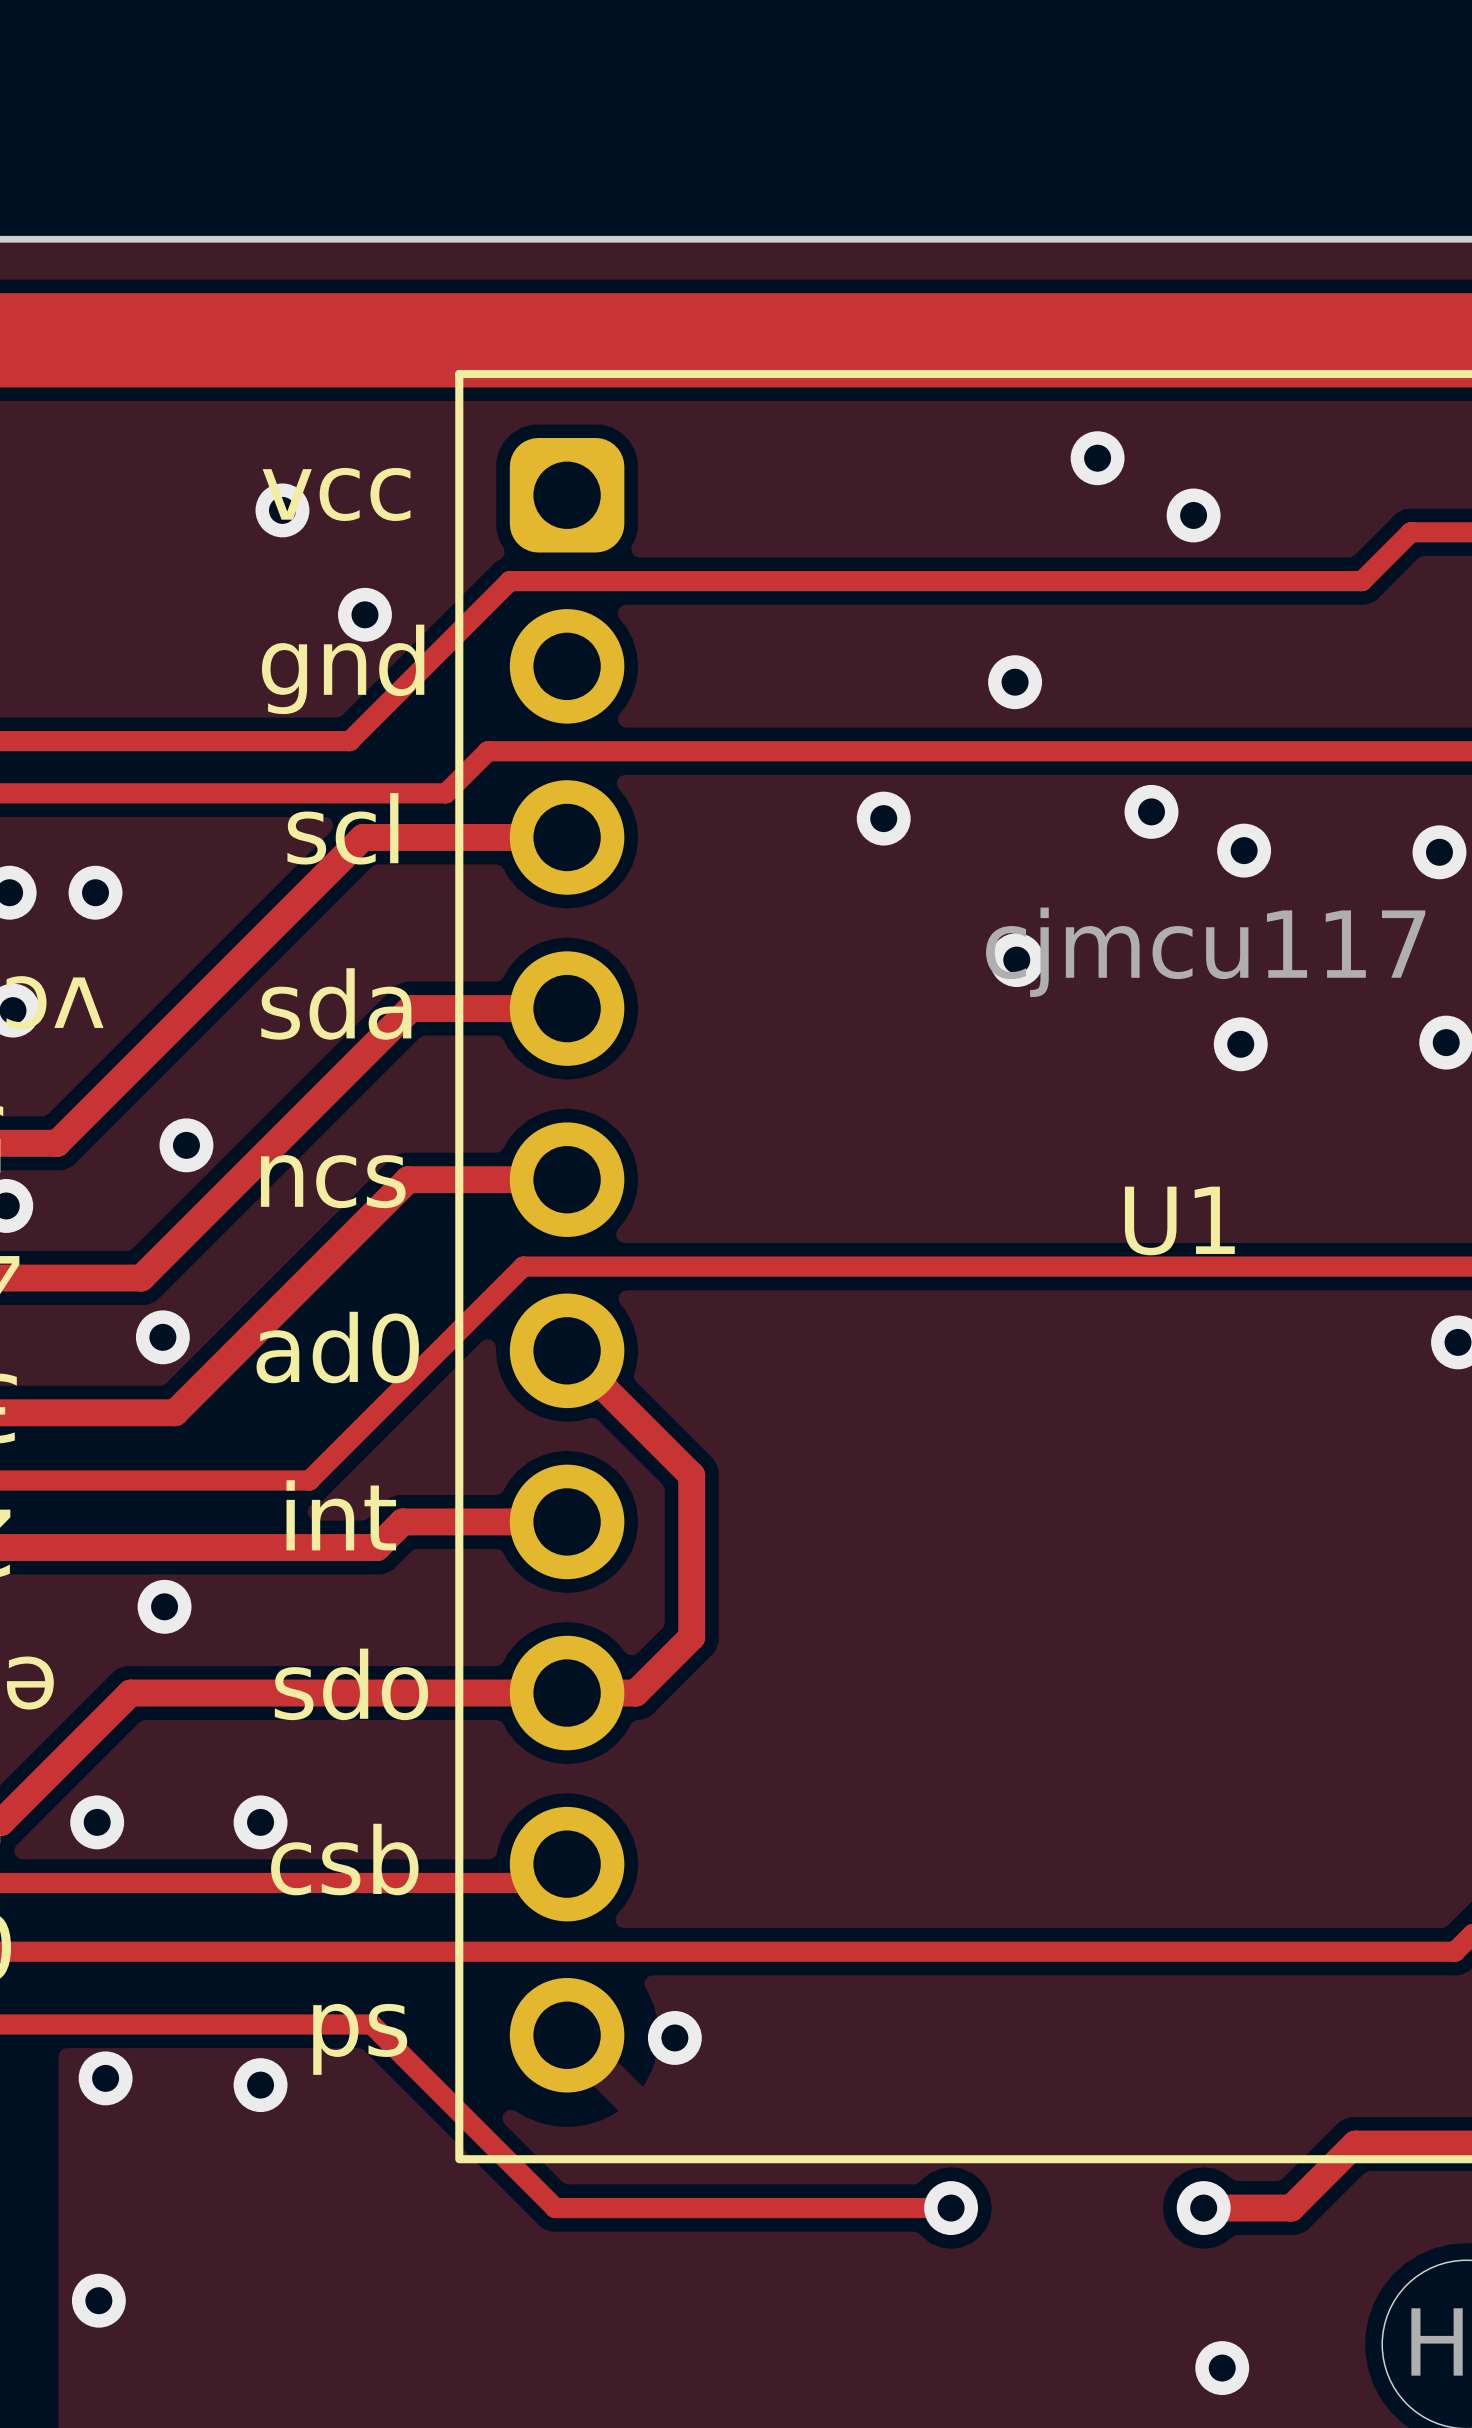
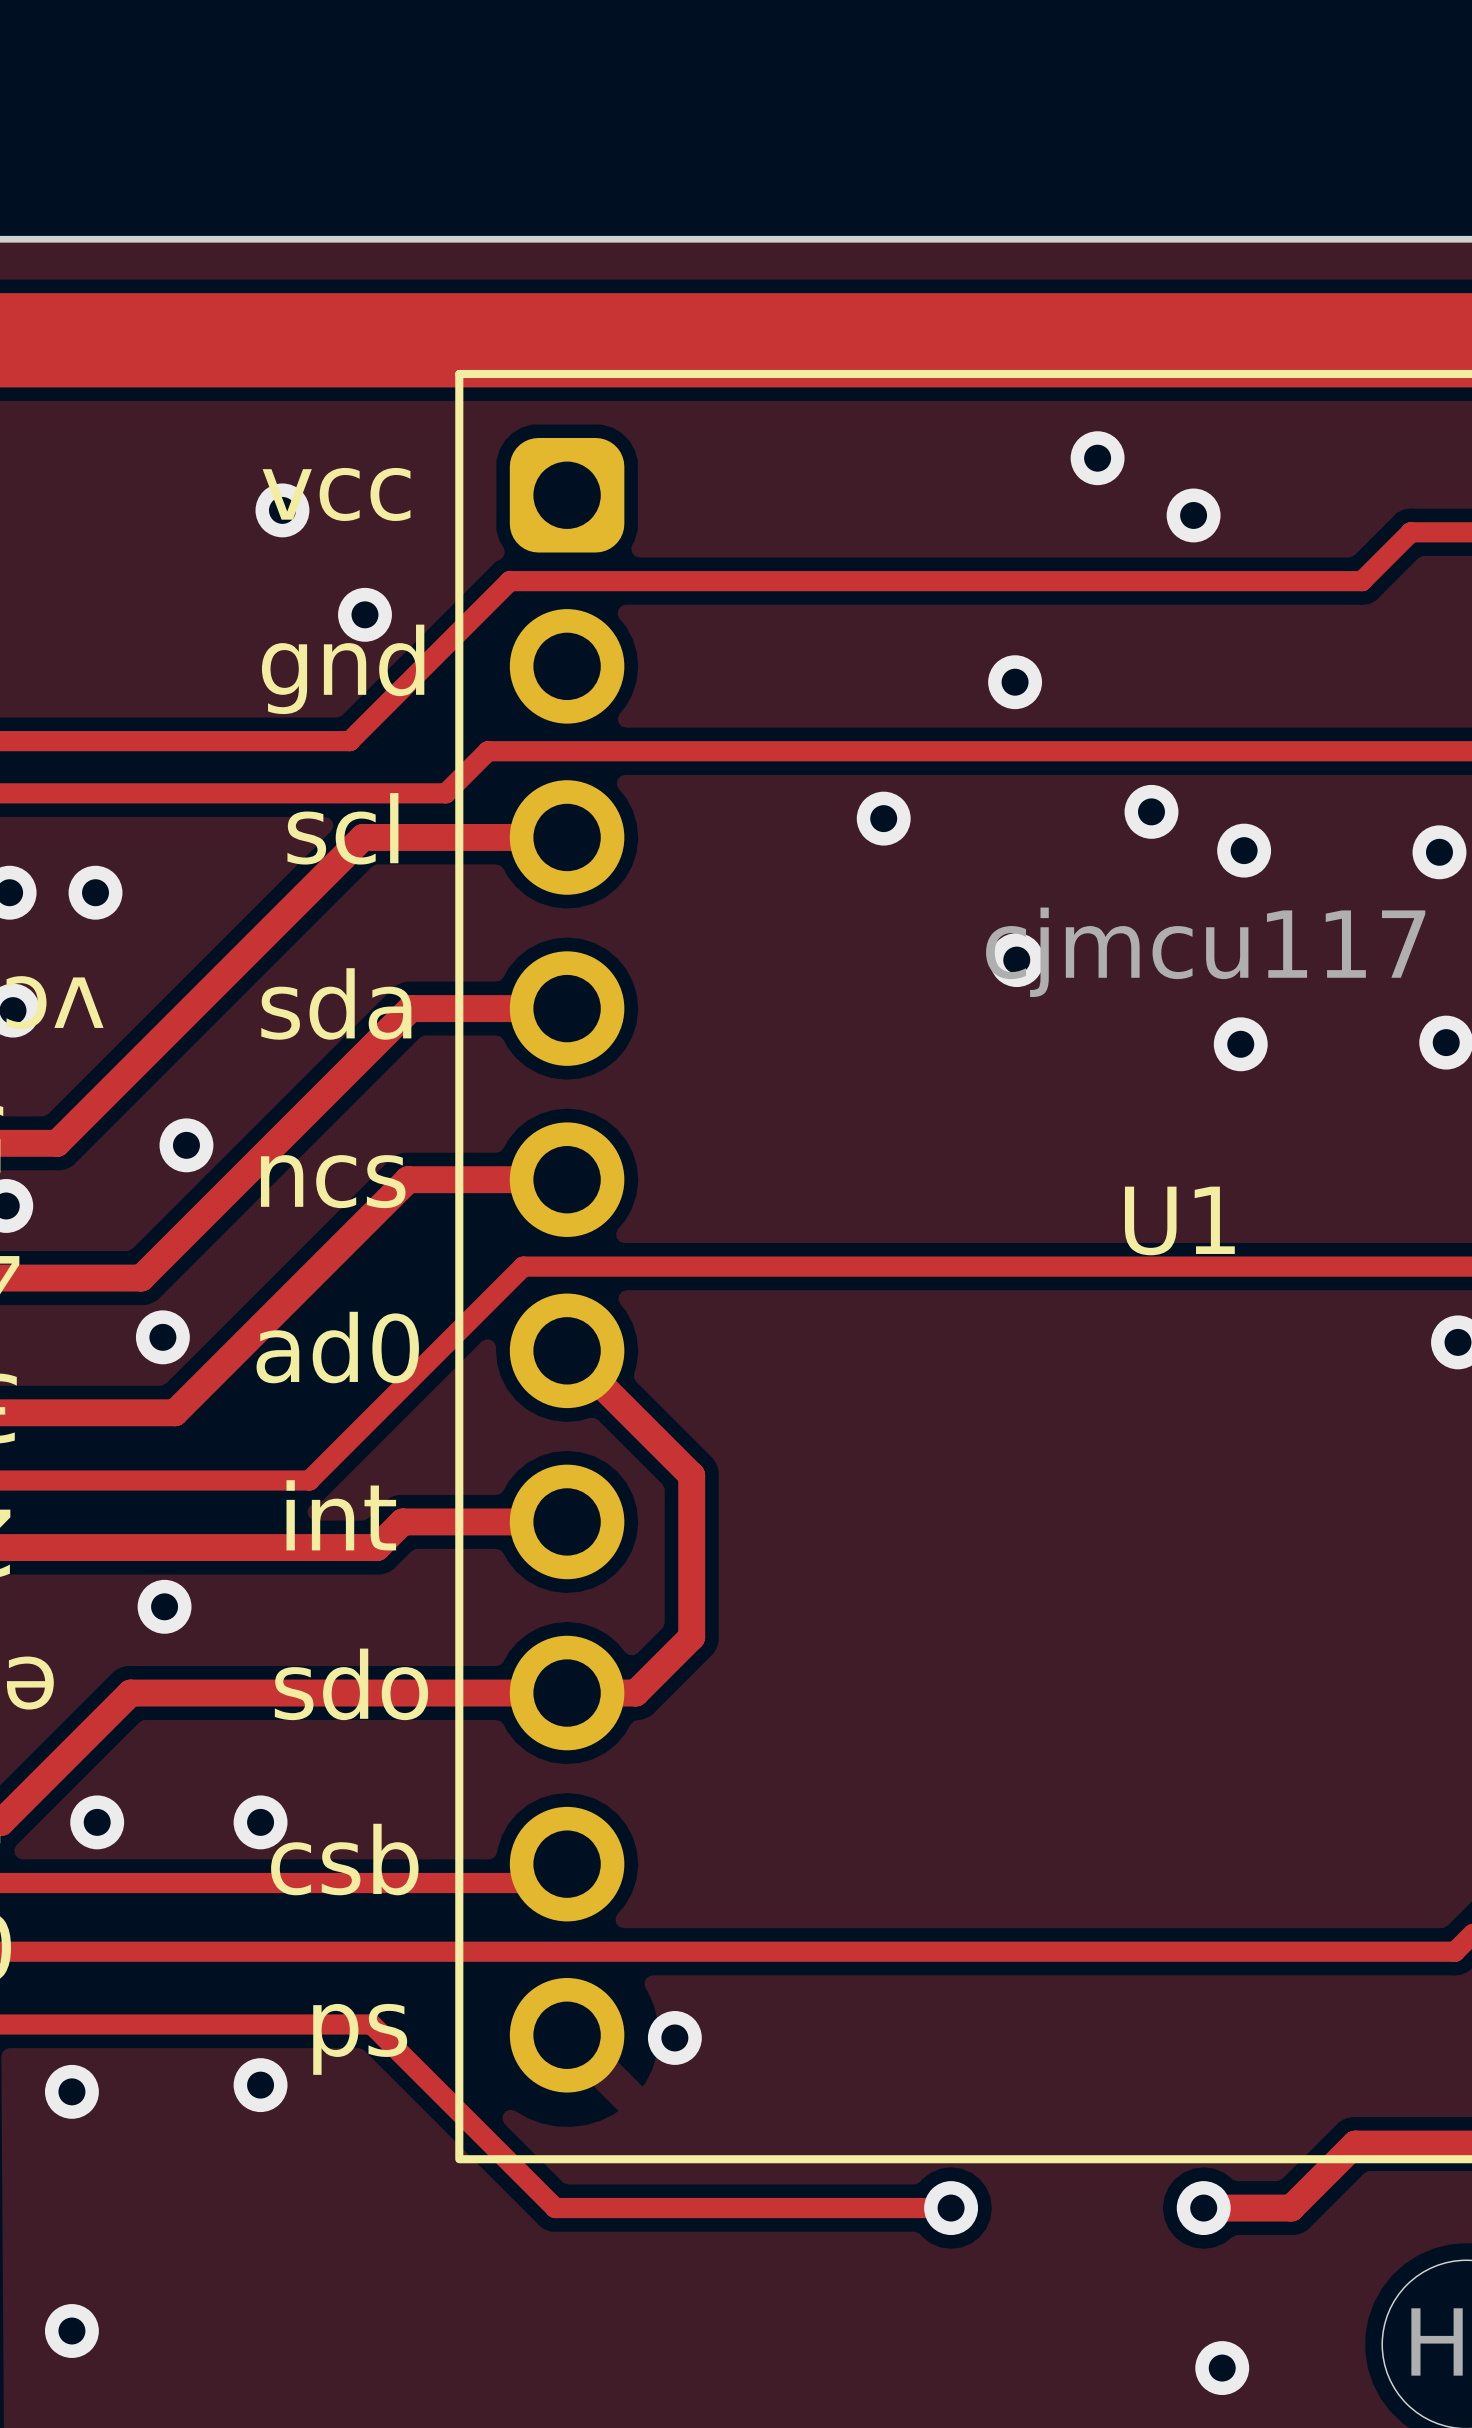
via position: (105, 2078) -> (71, 2091)
via position: (98, 2300) -> (71, 2331)

